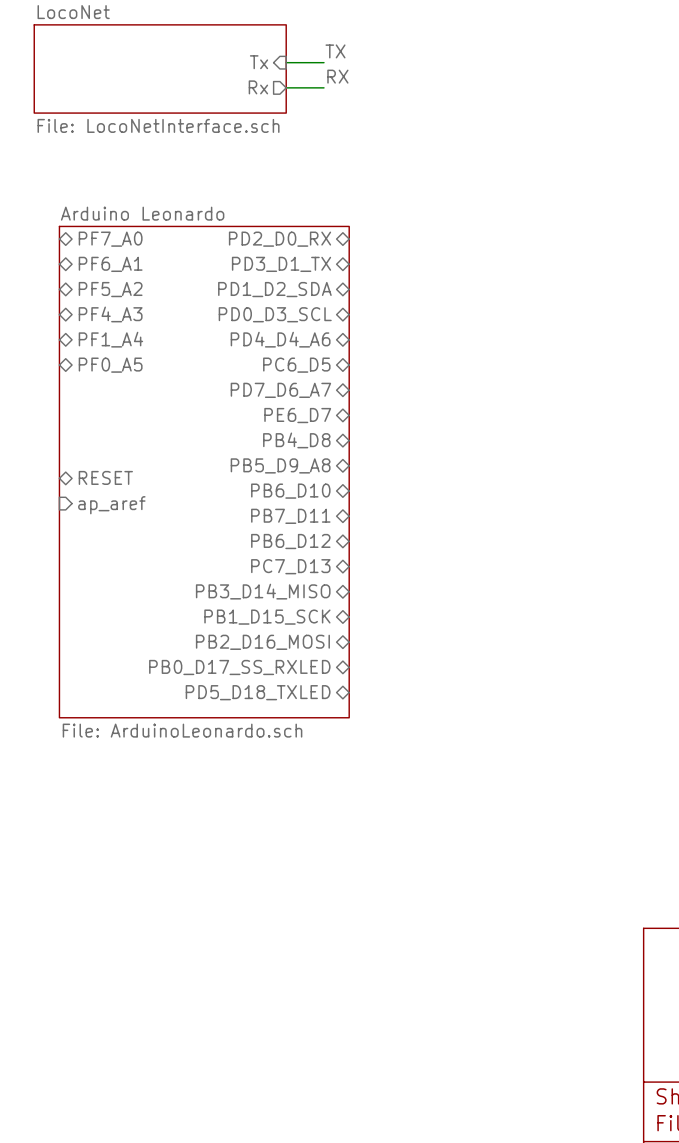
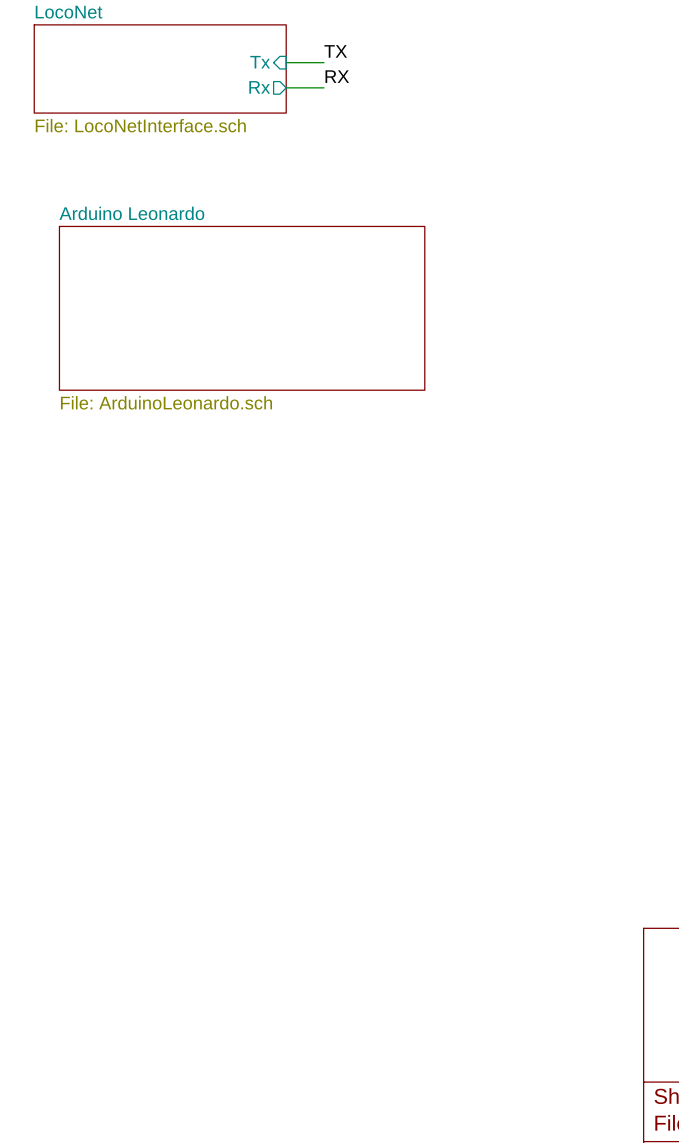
sheet pin: PF7_A0 (110, 239) -> none
sheet pin: PD2_D0_RX (280, 239) -> none
sheet pin: PF6_A1 (110, 264) -> none
sheet pin: PD3_D1_TX (281, 264) -> none
sheet pin: PF5_A2 (110, 289) -> none
sheet pin: PD1_D2_SDA (274, 289) -> none
sheet Arduino Leonardo: none -> File: ArduinoLeonardo.sch (242, 308)
sheet pin: PF4_A3 (110, 314) -> none
sheet pin: PD0_D3_SCL (275, 314) -> none
sheet pin: PF1_A4 (110, 339) -> none
sheet pin: PD4_D4_A6 (280, 339) -> none
sheet pin: PF0_A5 (110, 365) -> none
sheet pin: PC6_D5 (296, 365) -> none
sheet pin: PD7_D6_A7 (280, 390) -> none
sheet pin: PE6_D7 (297, 415) -> none
sheet pin: PB4_D8 (296, 440) -> none
sheet pin: PB5_D9_A8 (280, 465) -> none
sheet Arduino Leonardo: File: ArduinoLeonardo.sch (204, 472) -> none
sheet pin: RESET (105, 477) -> none
sheet pin: PB6_D10 (290, 491) -> none
sheet pin: ap_aref (111, 505) -> none
sheet pin: PB7_D11 (290, 516) -> none
sheet pin: PB6_D12 (290, 541) -> none
sheet pin: PC7_D13 (290, 566) -> none
sheet pin: PB3_D14_MISO (263, 591) -> none
sheet pin: PB1_D15_SCK (267, 617) -> none
sheet pin: PB2_D16_MOSI (262, 642) -> none
sheet pin: PB0_D17_SS_RXLED (239, 667) -> none
sheet pin: PD5_D18_TXLED (258, 692) -> none

